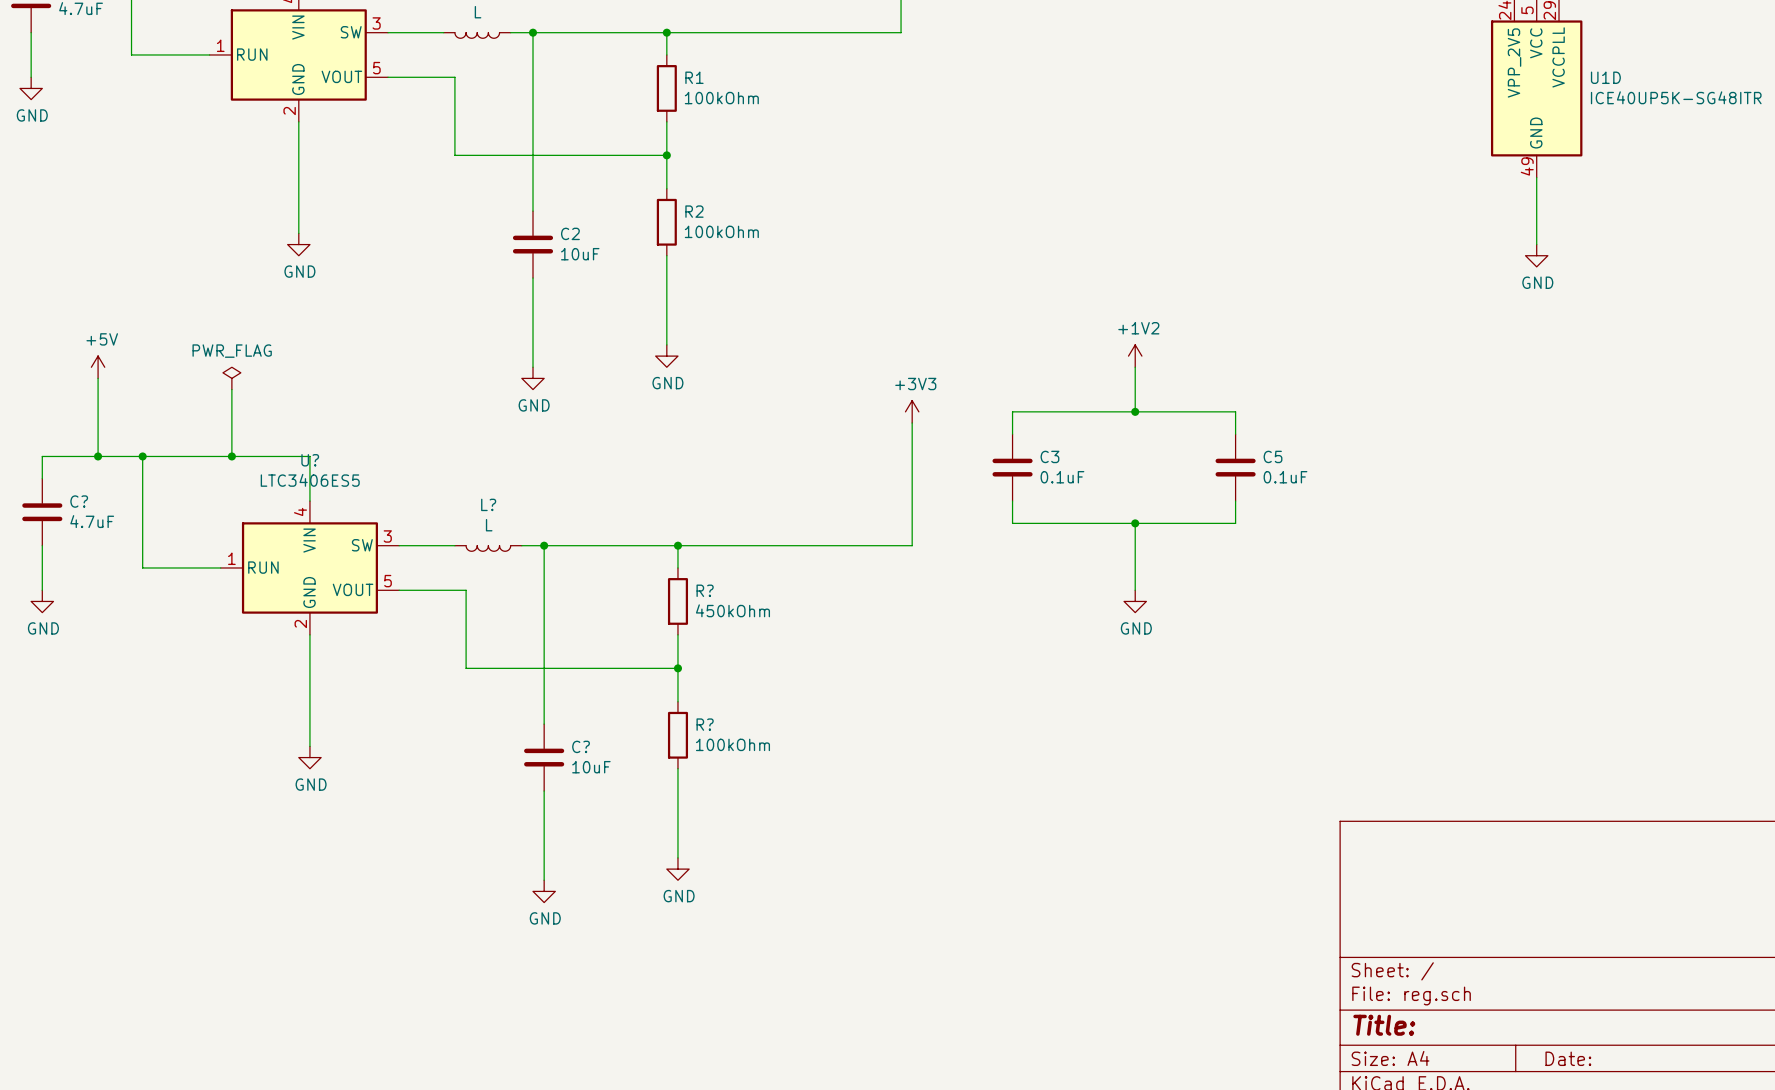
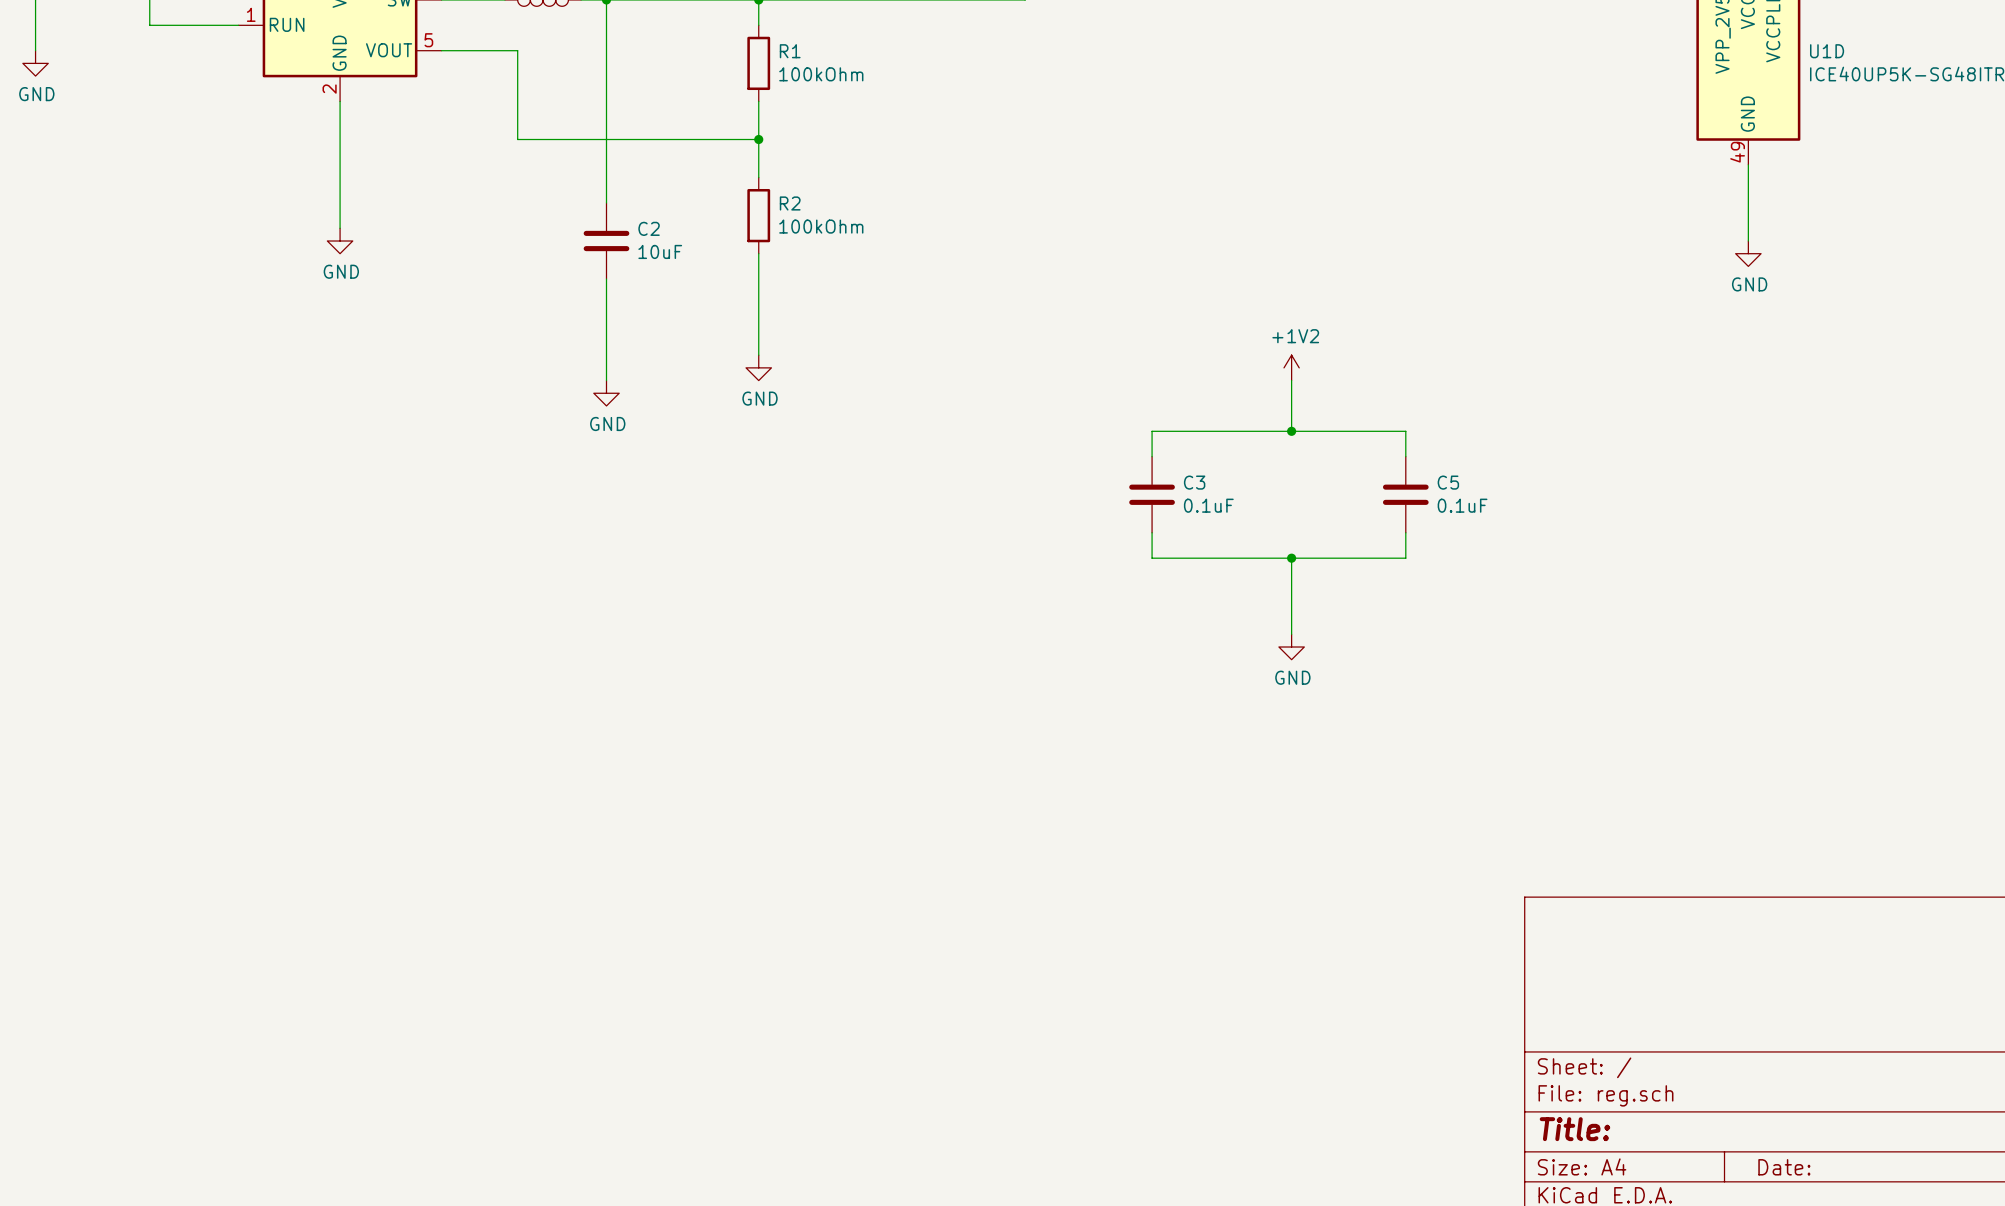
power symbol: +5V (98, 367) -> none
wire: (98, 378) (98, 456) -> none
power symbol: PWR_FLAG (231, 378) -> none
wire: (231, 389) (231, 456) -> none
power symbol: +3V3 (912, 411) -> none
wire: (912, 423) (912, 545) (521, 545) -> none
junction: (98, 456) -> none
wire: (142, 456) (142, 567) (220, 567) -> none
junction: (142, 456) -> none
junction: (231, 456) -> none
wire: (42, 478) (42, 456) (309, 456) (309, 501) -> none
C?: 4.7uF (42, 512) -> none
wire: (42, 545) (42, 590) -> none
wire: (399, 545) (454, 545) -> none
wire: (544, 545) (544, 724) -> none
junction: (544, 545) -> none
wire: (677, 545) (677, 567) -> none
junction: (677, 545) -> none
L?: L (488, 548) -> none
U?: LTC3406ES5 (309, 567) -> none
wire: (399, 590) (466, 590) (466, 668) (677, 668) -> none
power symbol: GND (42, 601) -> none
R?: 450kOhm (677, 601) -> none
wire: (309, 634) (309, 746) -> none
wire: (677, 634) (677, 701) -> none
junction: (677, 668) -> none
R?: 100kOhm (677, 735) -> none
power symbol: GND (309, 757) -> none
C?: 10uF (544, 757) -> none
wire: (677, 768) (677, 857) -> none
wire: (544, 791) (544, 880) -> none
power symbol: GND (677, 869) -> none
power symbol: GND (544, 891) -> none

